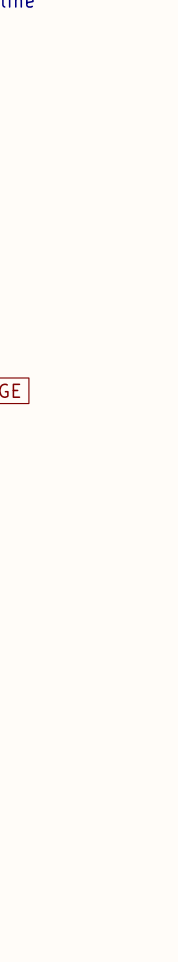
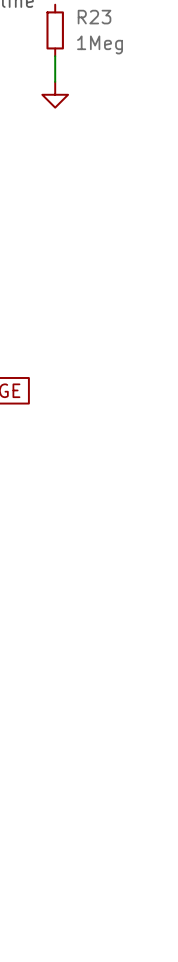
R23: none -> 1Meg (55, 30)
wire: none -> (55, 56) (55, 81)
power symbol: none -> (55, 94)

